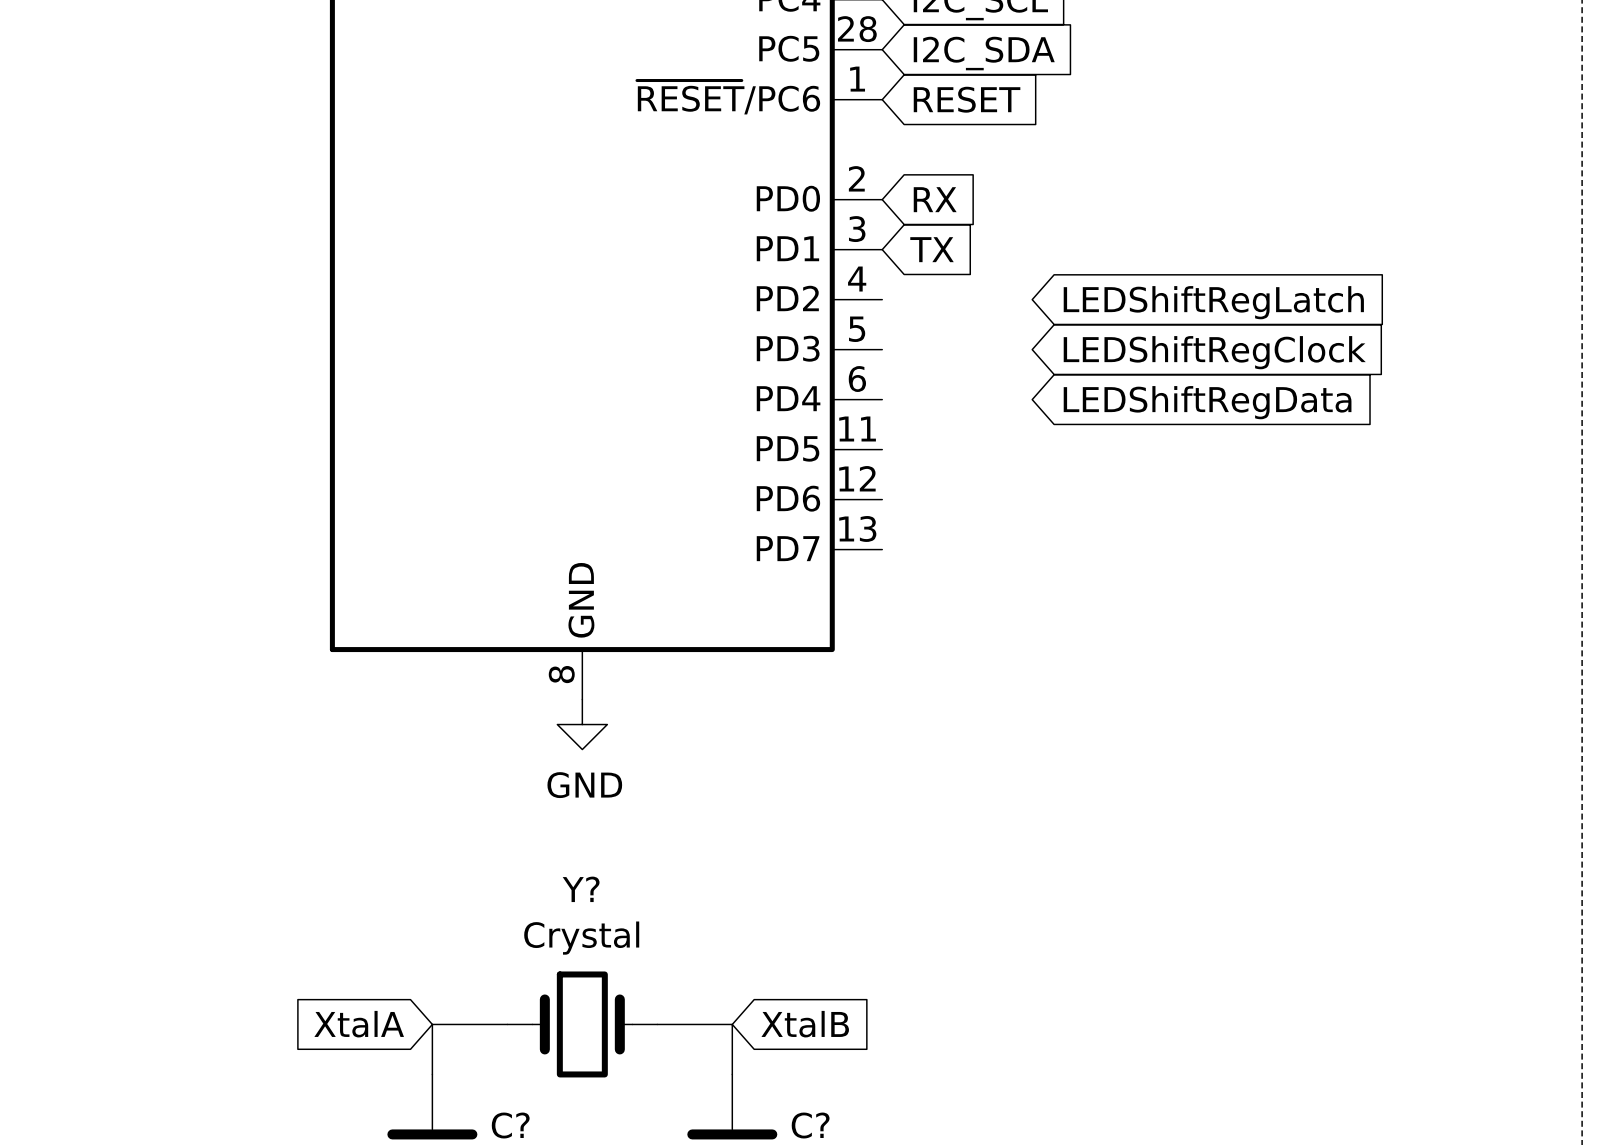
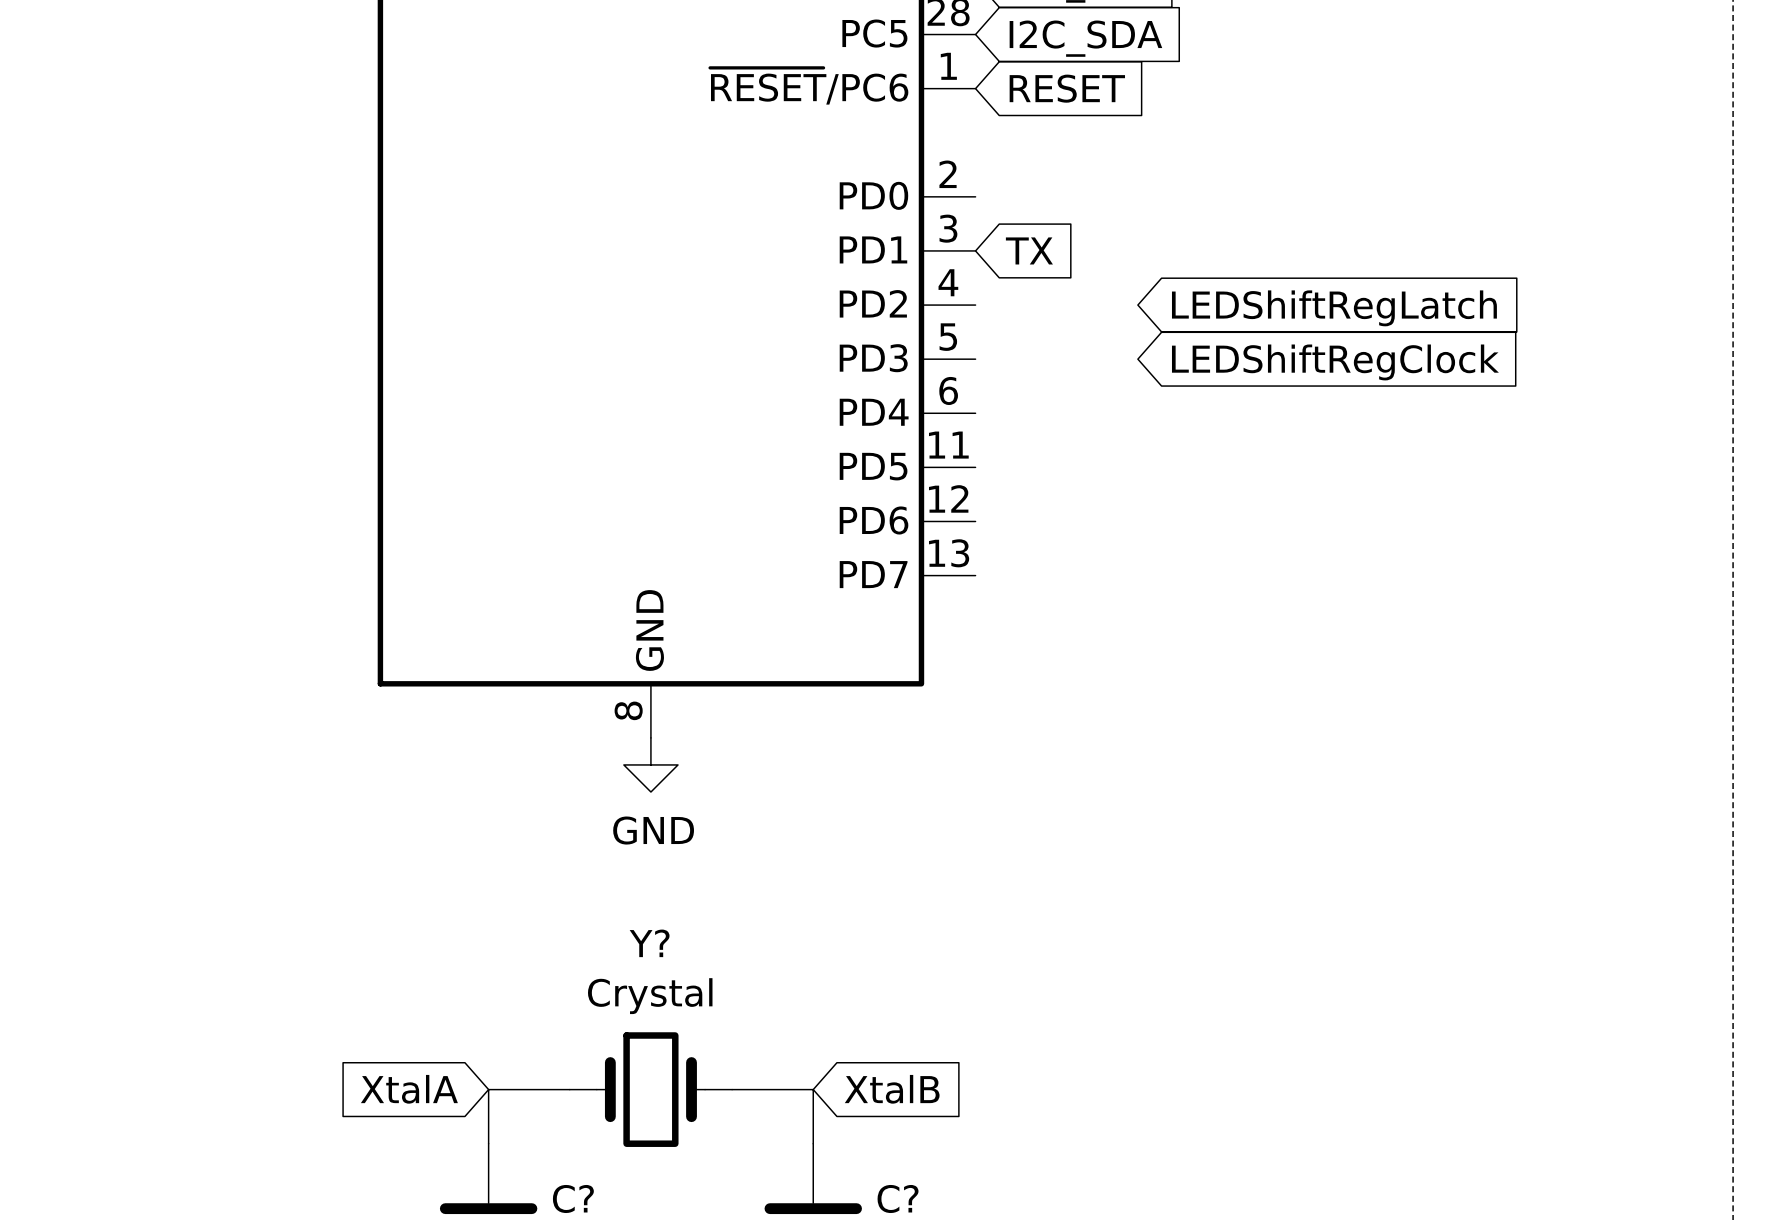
global label: RX (935, 199) -> none
global label: LEDShiftRegData (1207, 402) -> none

